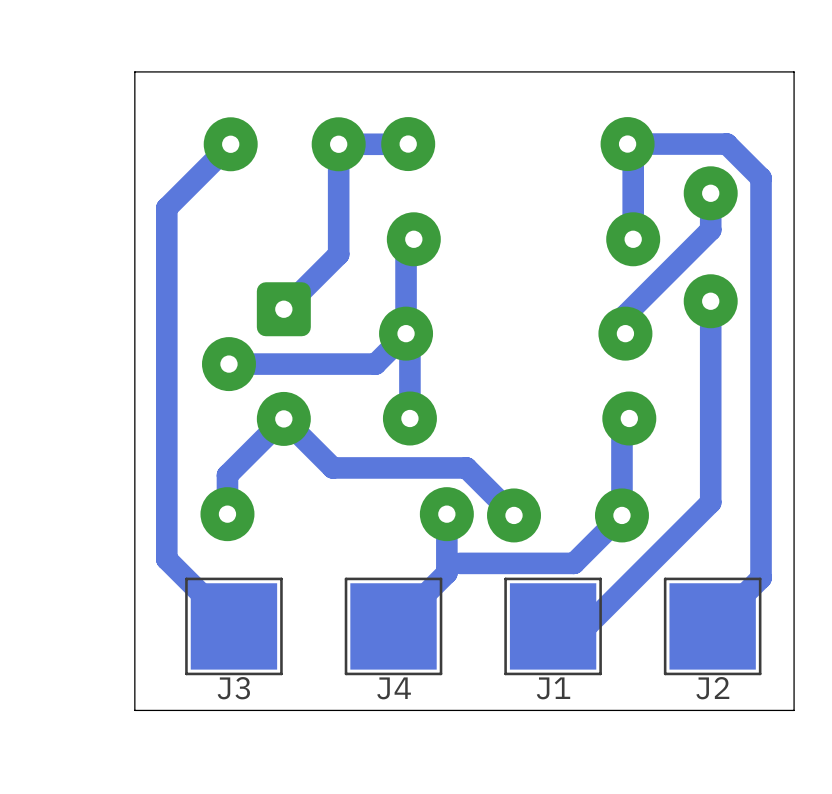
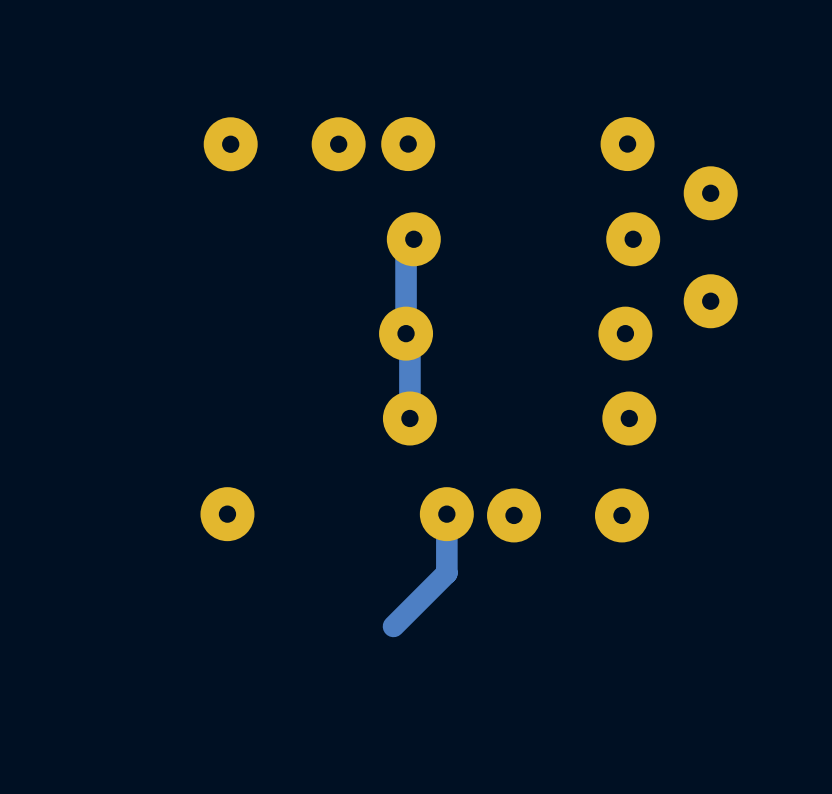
board edge: (794, 71) (134, 71) (134, 710) (794, 710) (794, 71) -> none
track: (230, 144) (166, 208) (166, 559) (233, 626) -> none
track: (407, 144) (338, 144) (338, 254) (283, 309) -> none
track: (710, 193) (710, 229) (625, 315) (625, 333) -> none
track: (633, 239) (633, 149) (627, 144) (726, 144) (761, 178) (761, 578) (712, 626) -> none
track: (710, 301) (710, 502) (586, 626) (553, 626) -> none
track: (406, 333) (375, 364) (228, 364) -> none
part: (256, 364) -> none
track: (629, 418) (621, 425) (621, 515) (574, 563) (459, 563) -> none
track: (227, 514) (227, 475) (283, 418) (332, 467) (466, 467) (514, 515) -> none
J3: (233, 626) -> none
J4: (393, 626) -> none
J1: (553, 626) -> none
J2: (712, 626) -> none

